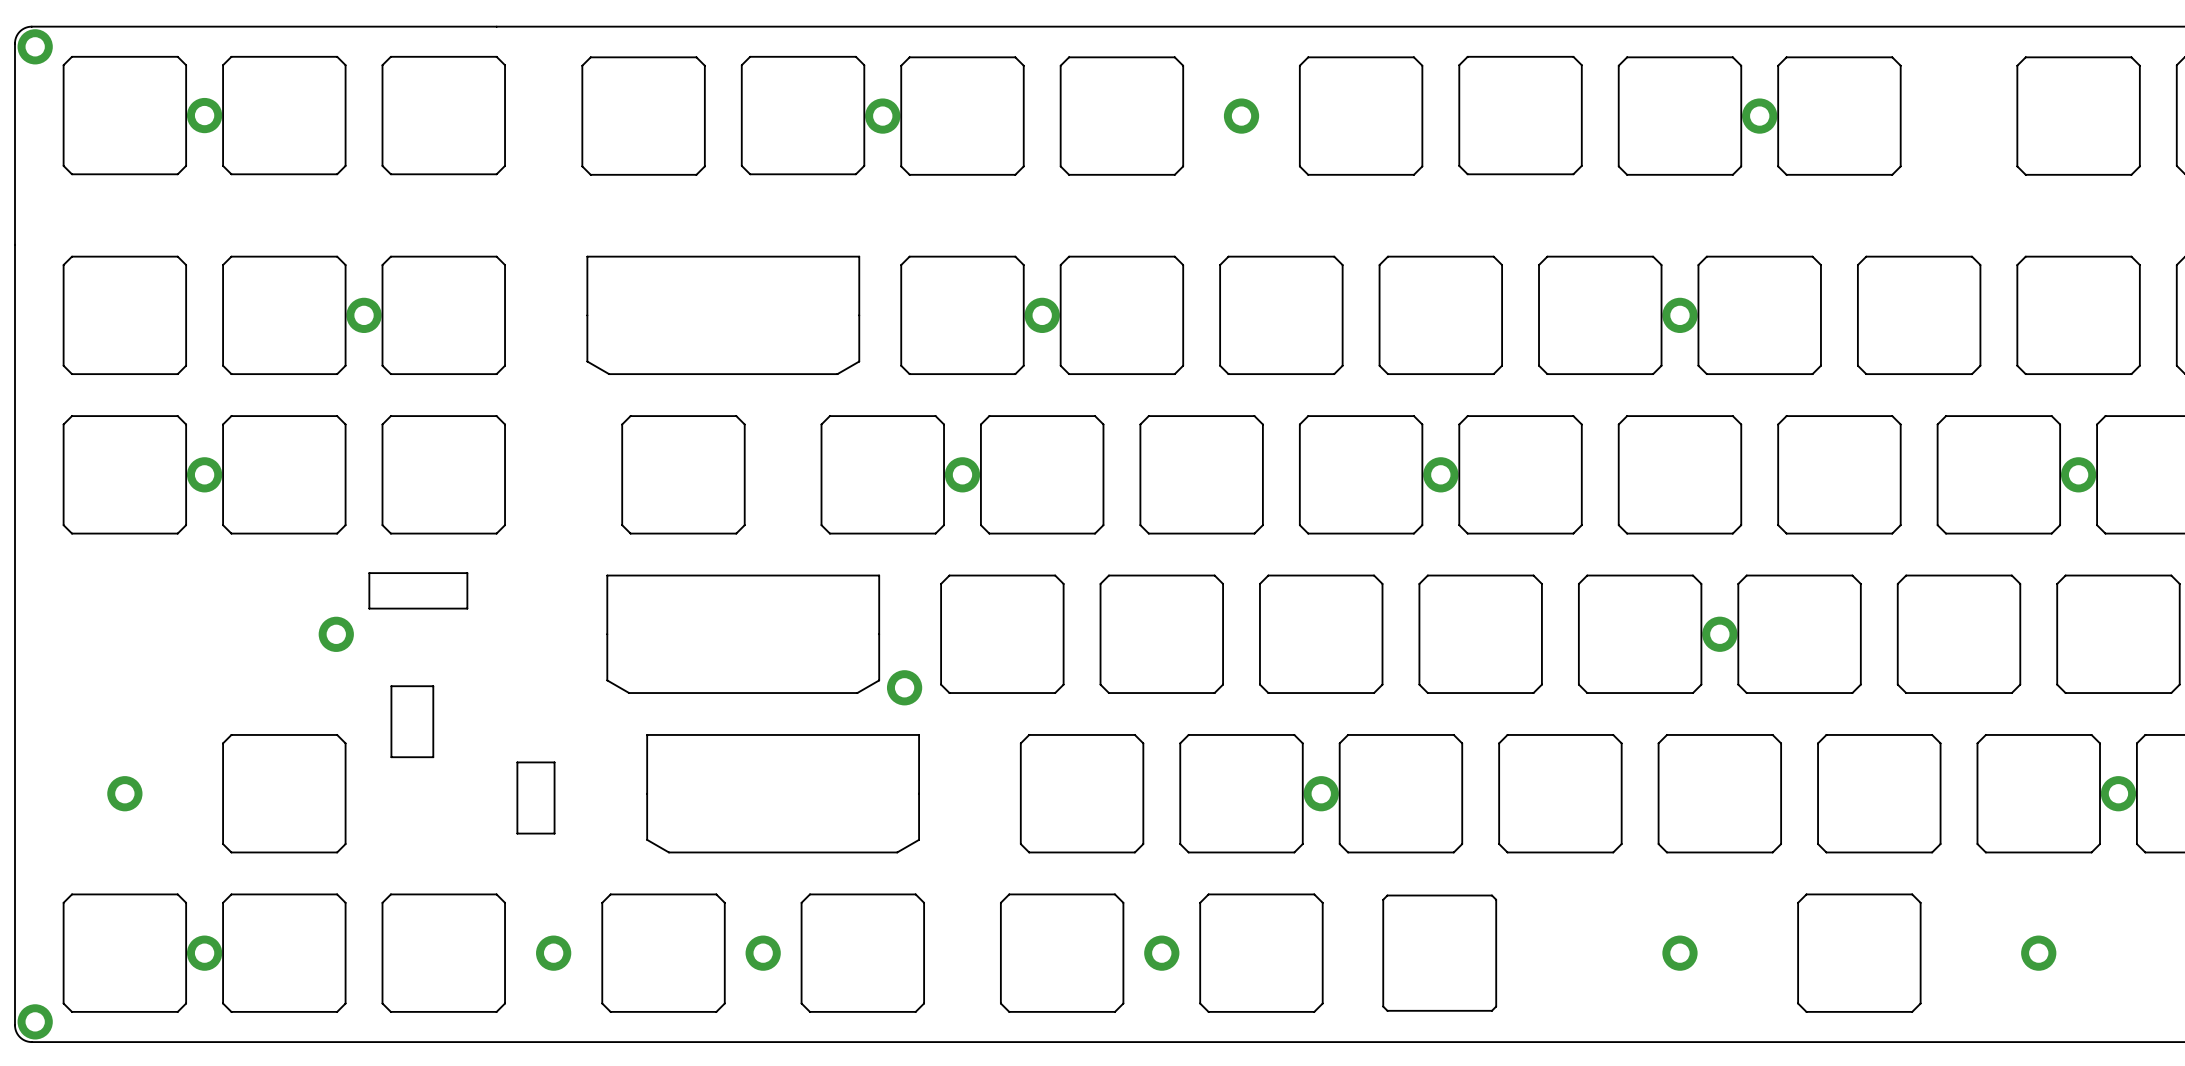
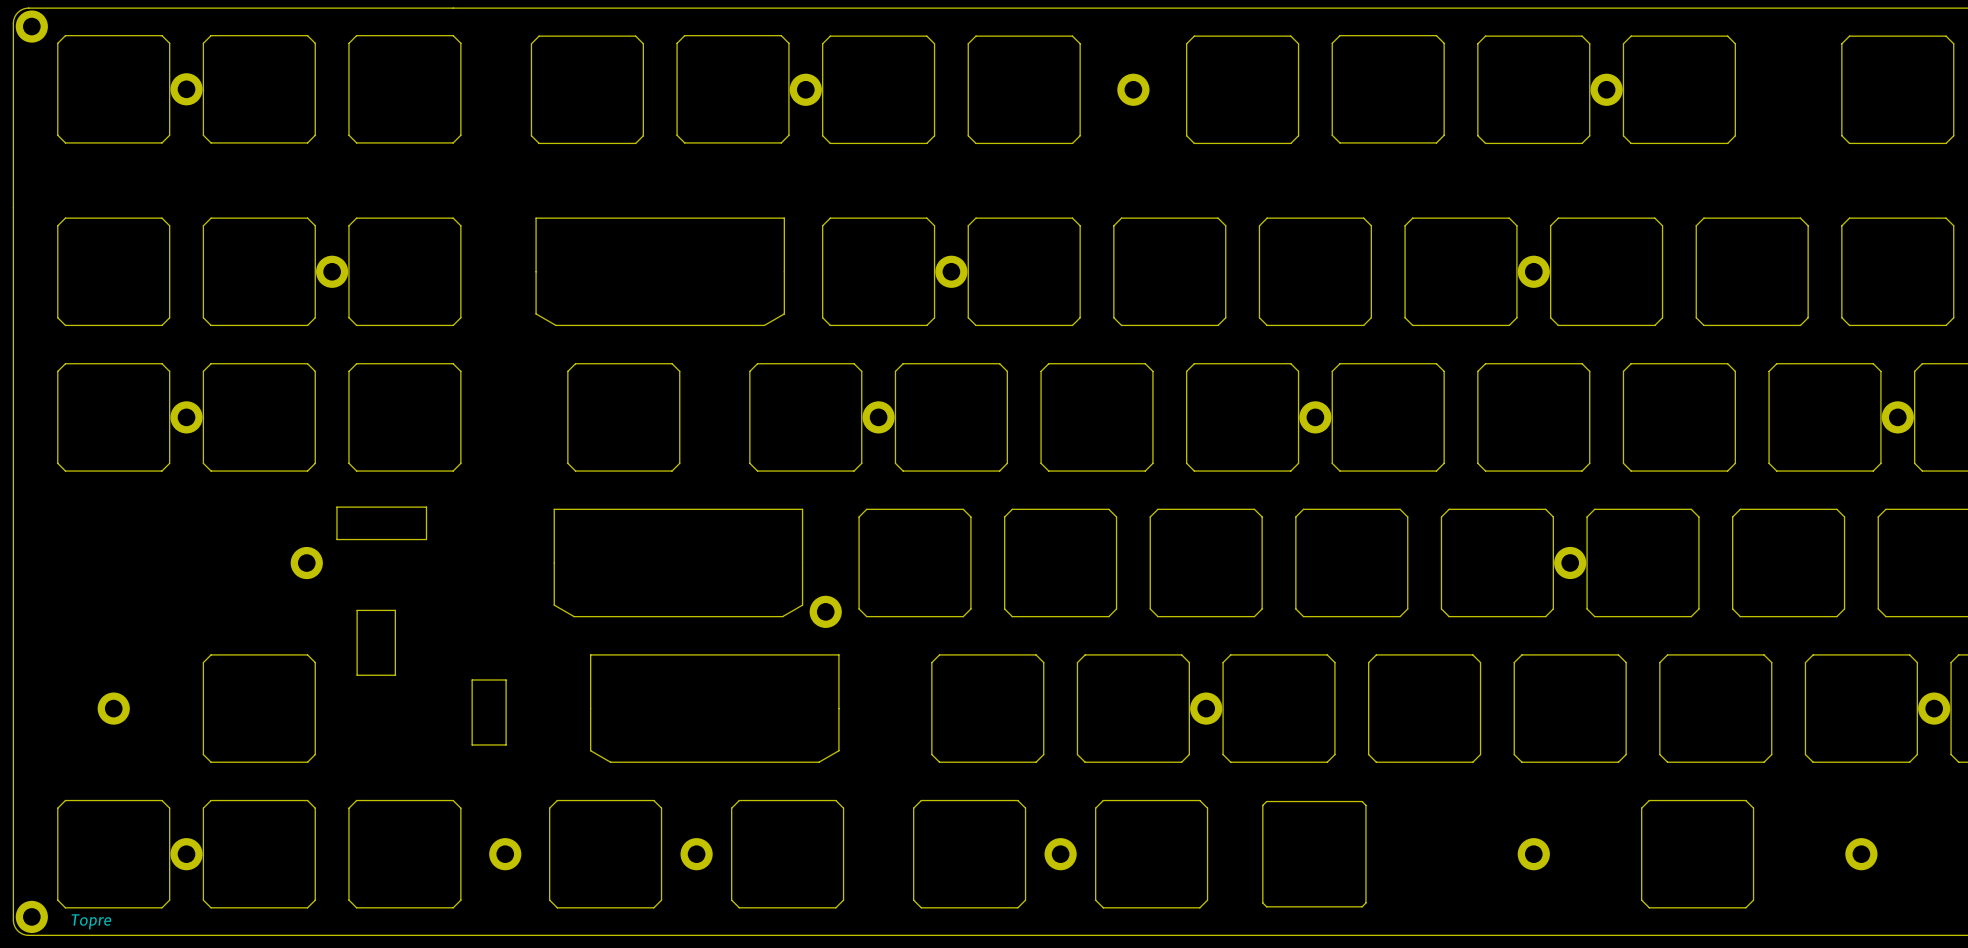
text: none -> Topre (91, 921)

